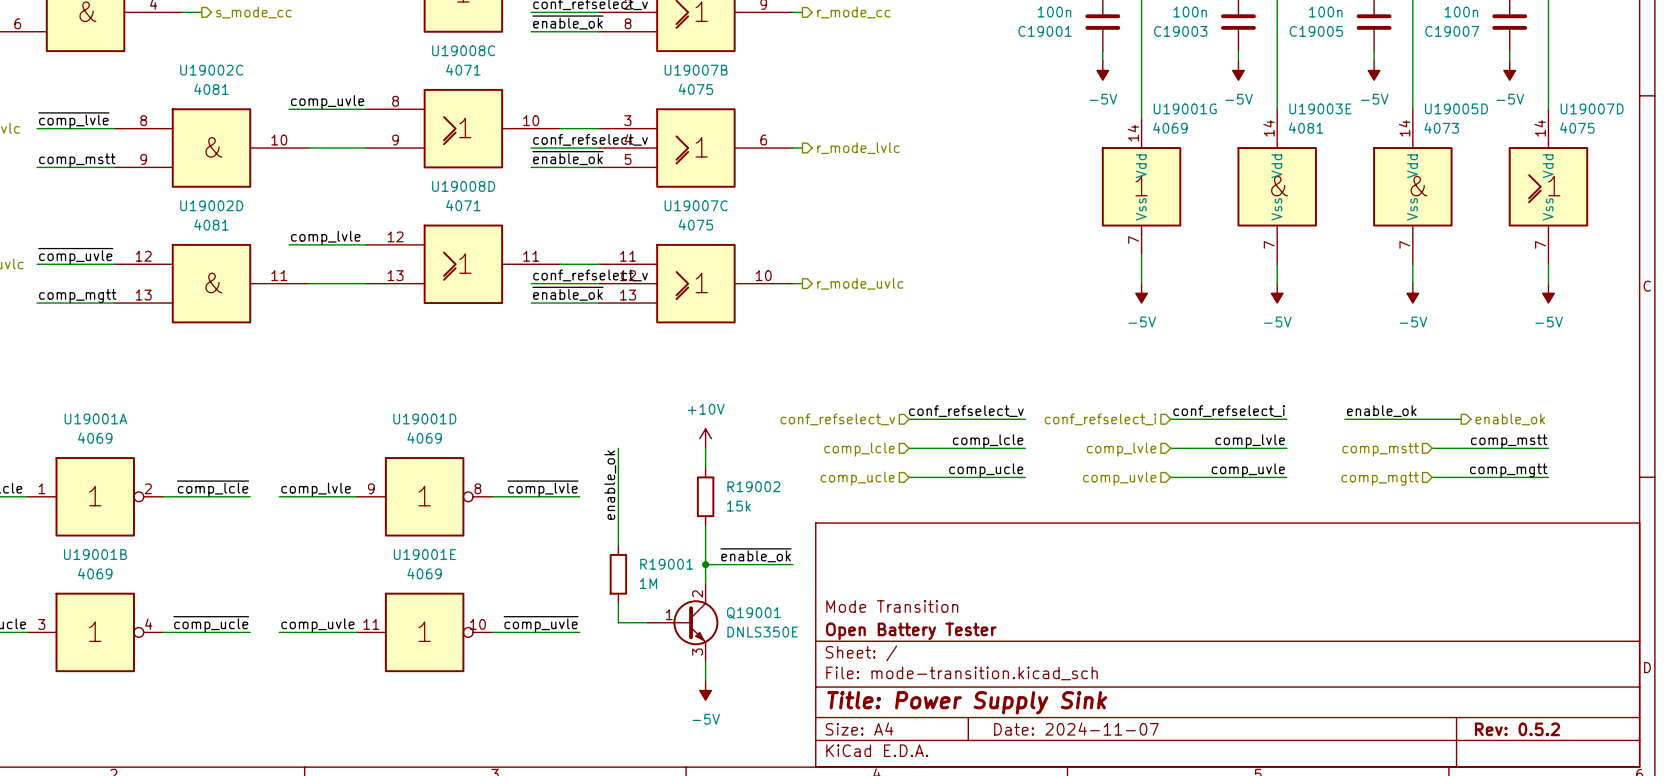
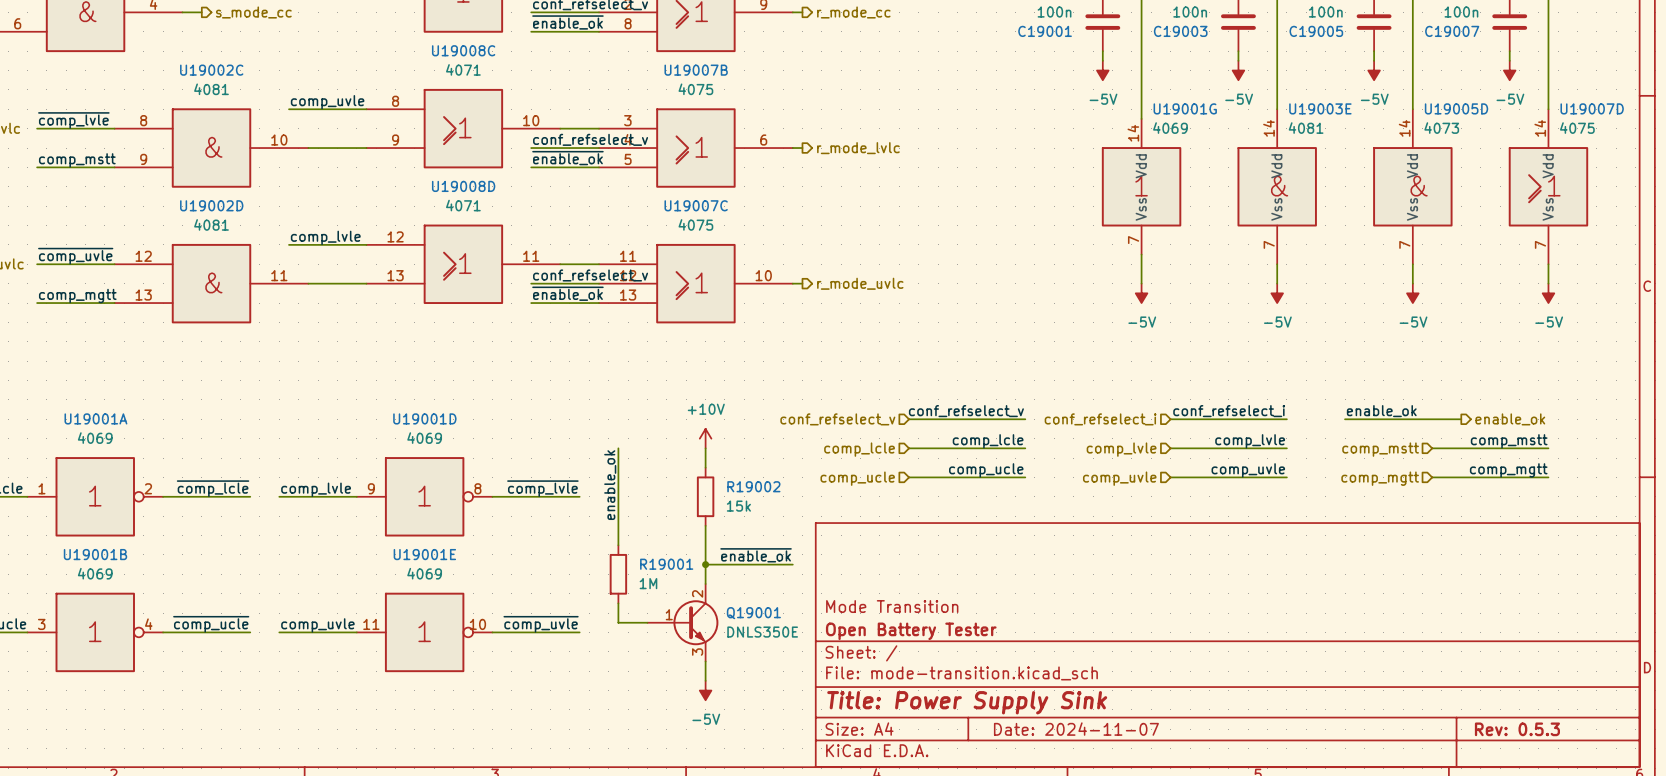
title block: Rev: 0.5.2 (1517, 729) -> Rev: 0.5.3 (1517, 729)

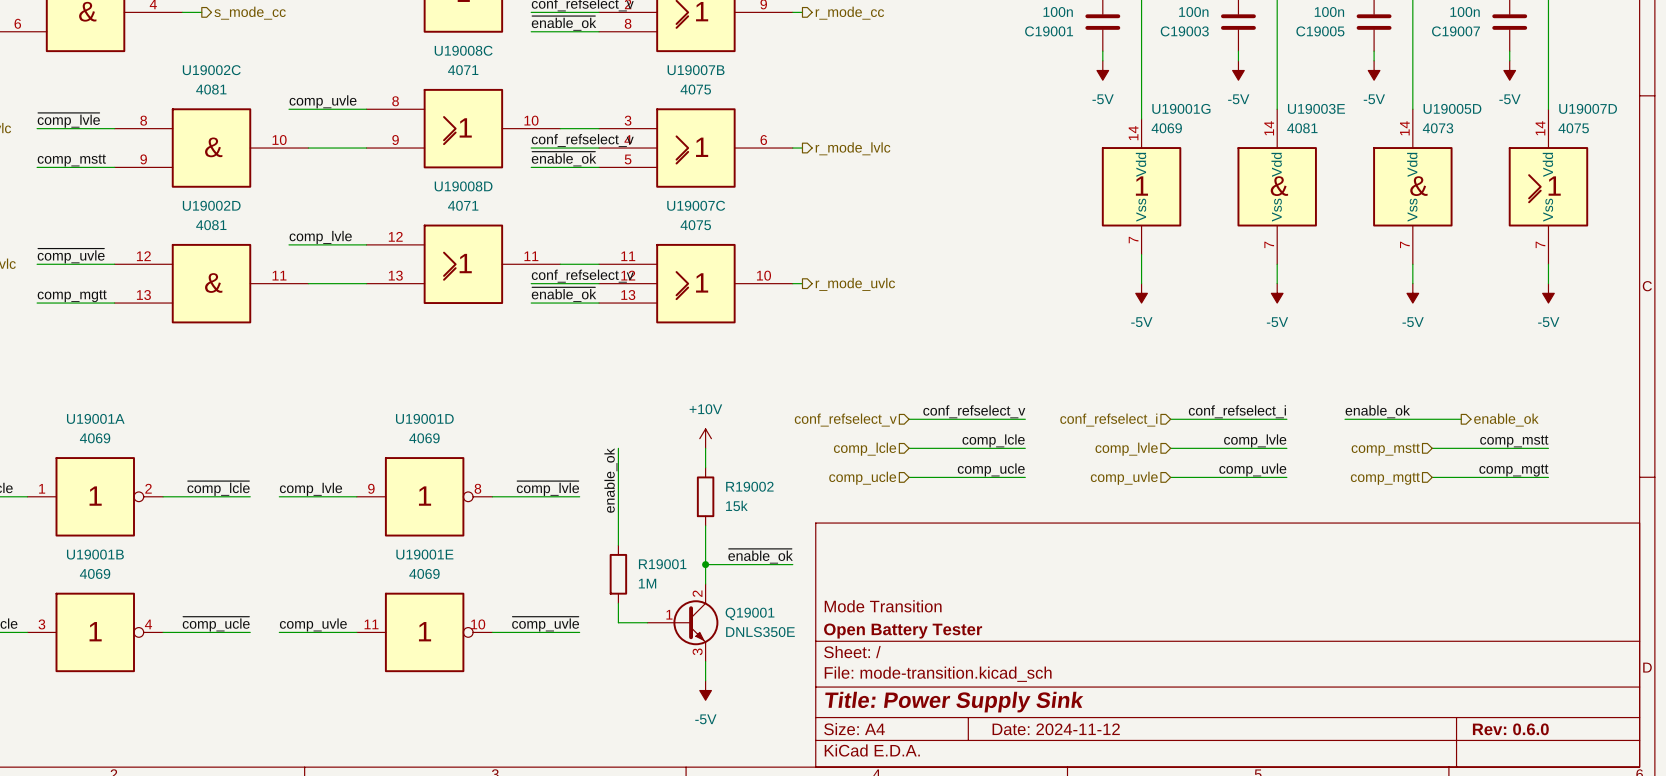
title block: Date: 2024-11-07 (1076, 729) -> Date: 2024-11-12 (1056, 729)
title block: Rev: 0.5.3 (1517, 729) -> Rev: 0.6.0 (1510, 729)

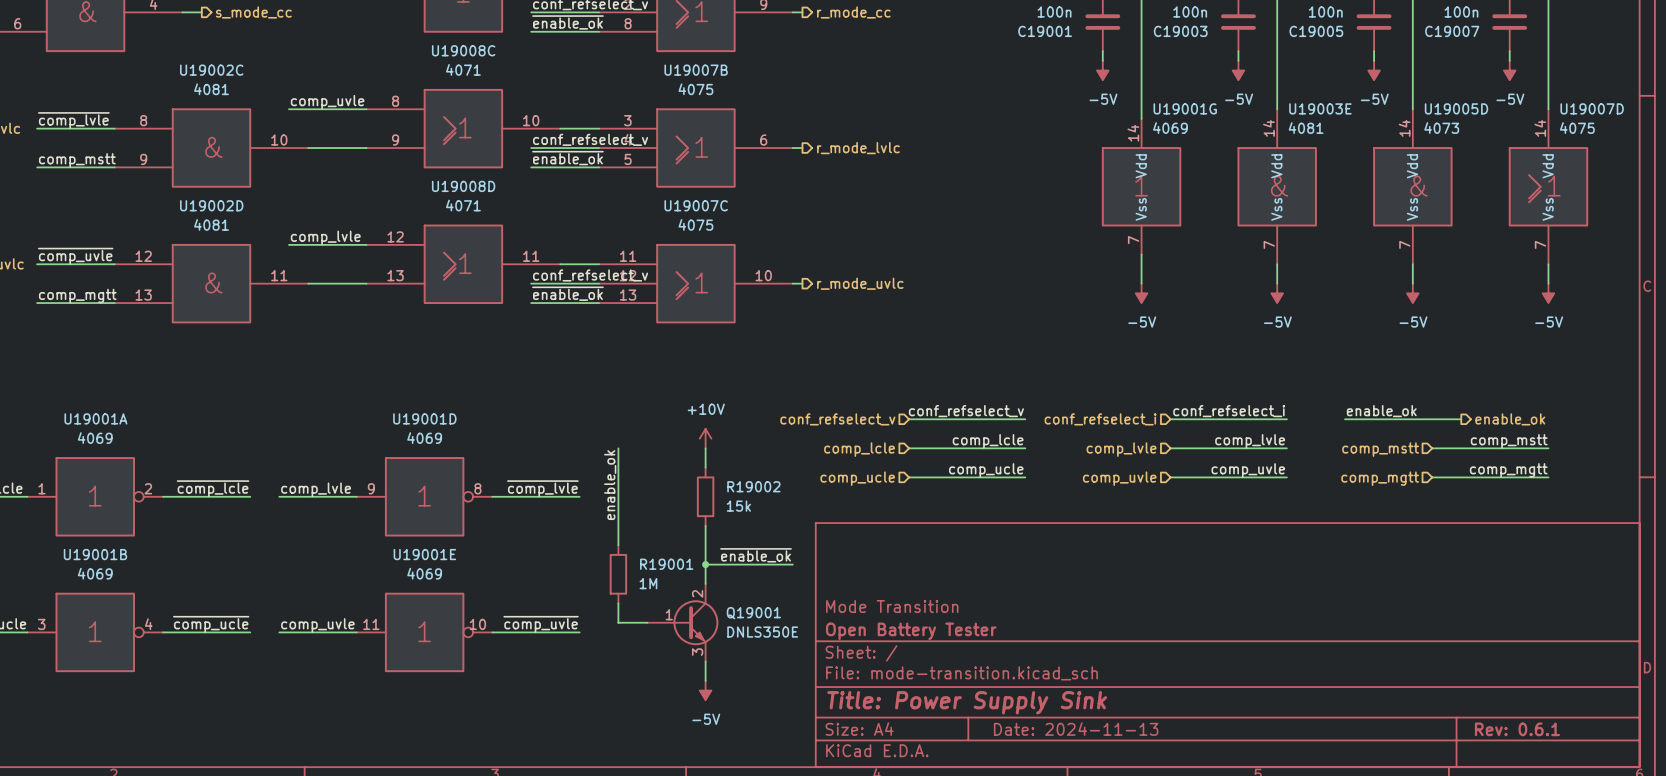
title block: Date: 2024-11-12 (1056, 729) -> Date: 2024-11-13 (1076, 729)
title block: Rev: 0.6.0 (1510, 729) -> Rev: 0.6.1 (1517, 729)

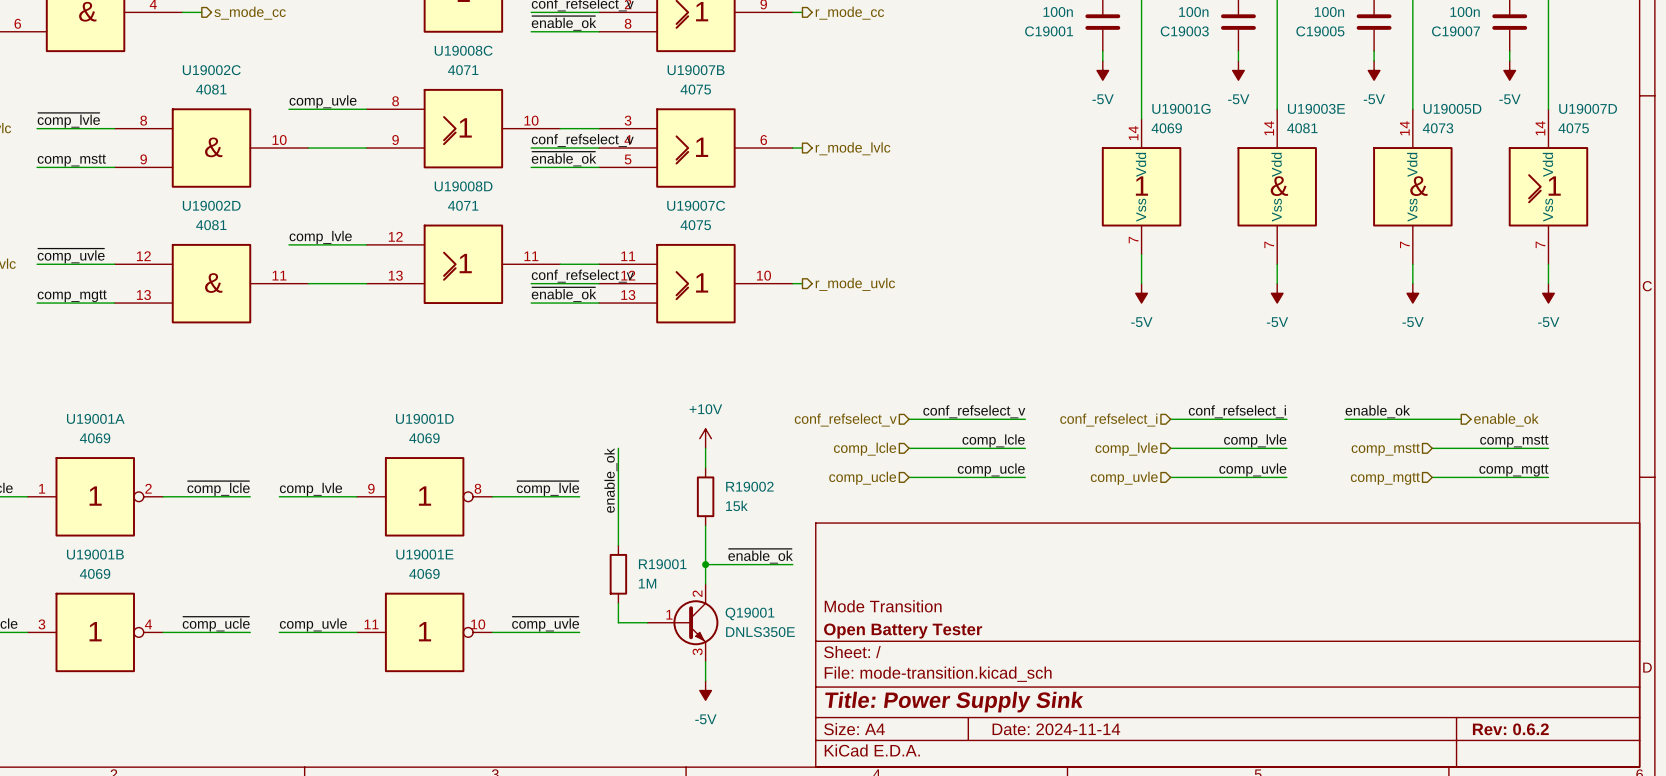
title block: Date: 2024-11-13 (1076, 729) -> Date: 2024-11-14 (1056, 729)
title block: Rev: 0.6.1 (1517, 729) -> Rev: 0.6.2 (1510, 729)

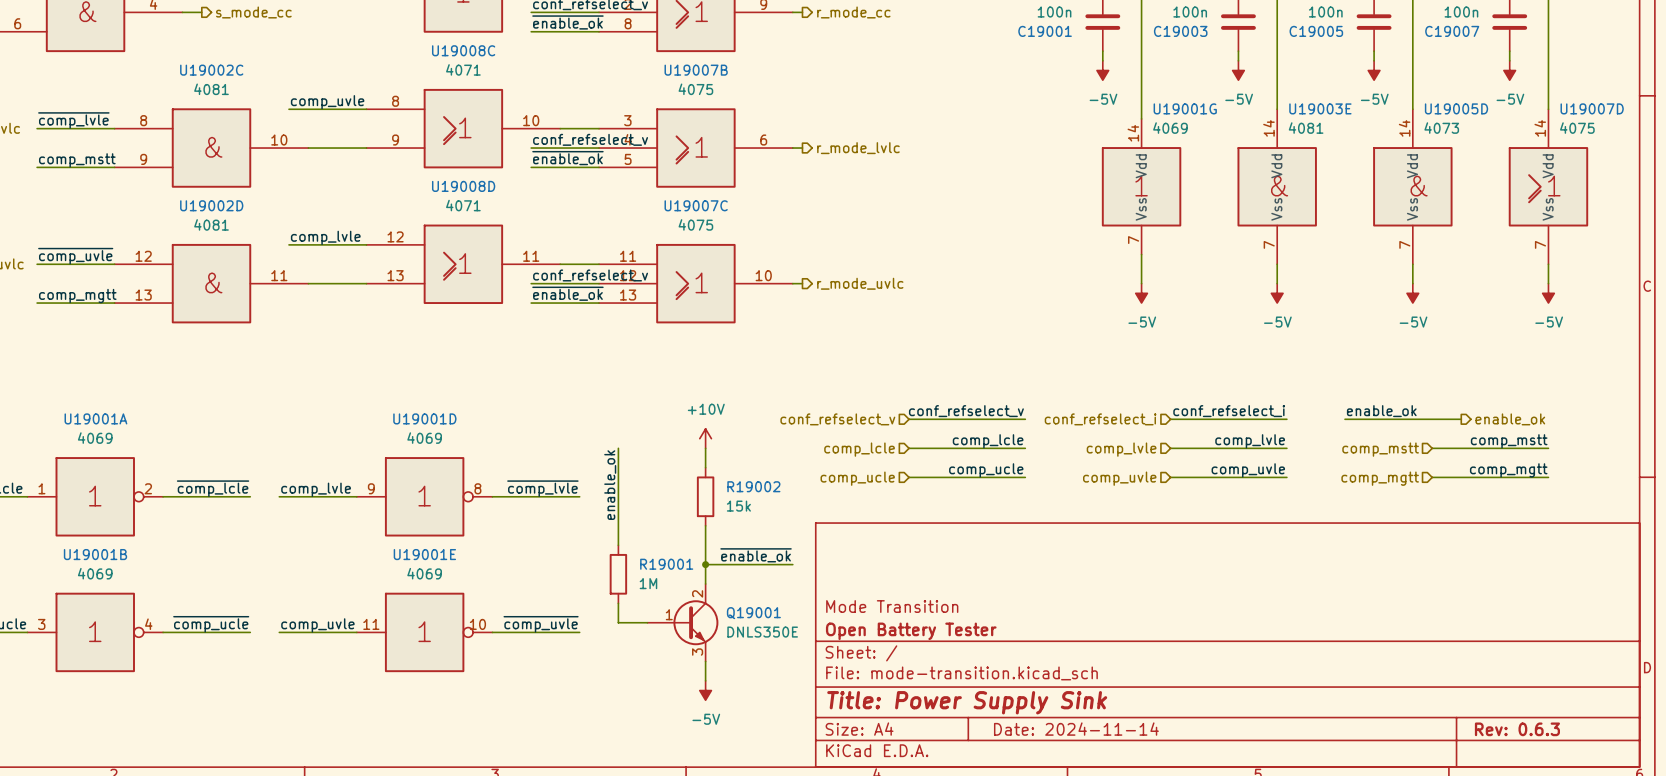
title block: Rev: 0.6.2 (1510, 729) -> Rev: 0.6.3 (1517, 729)

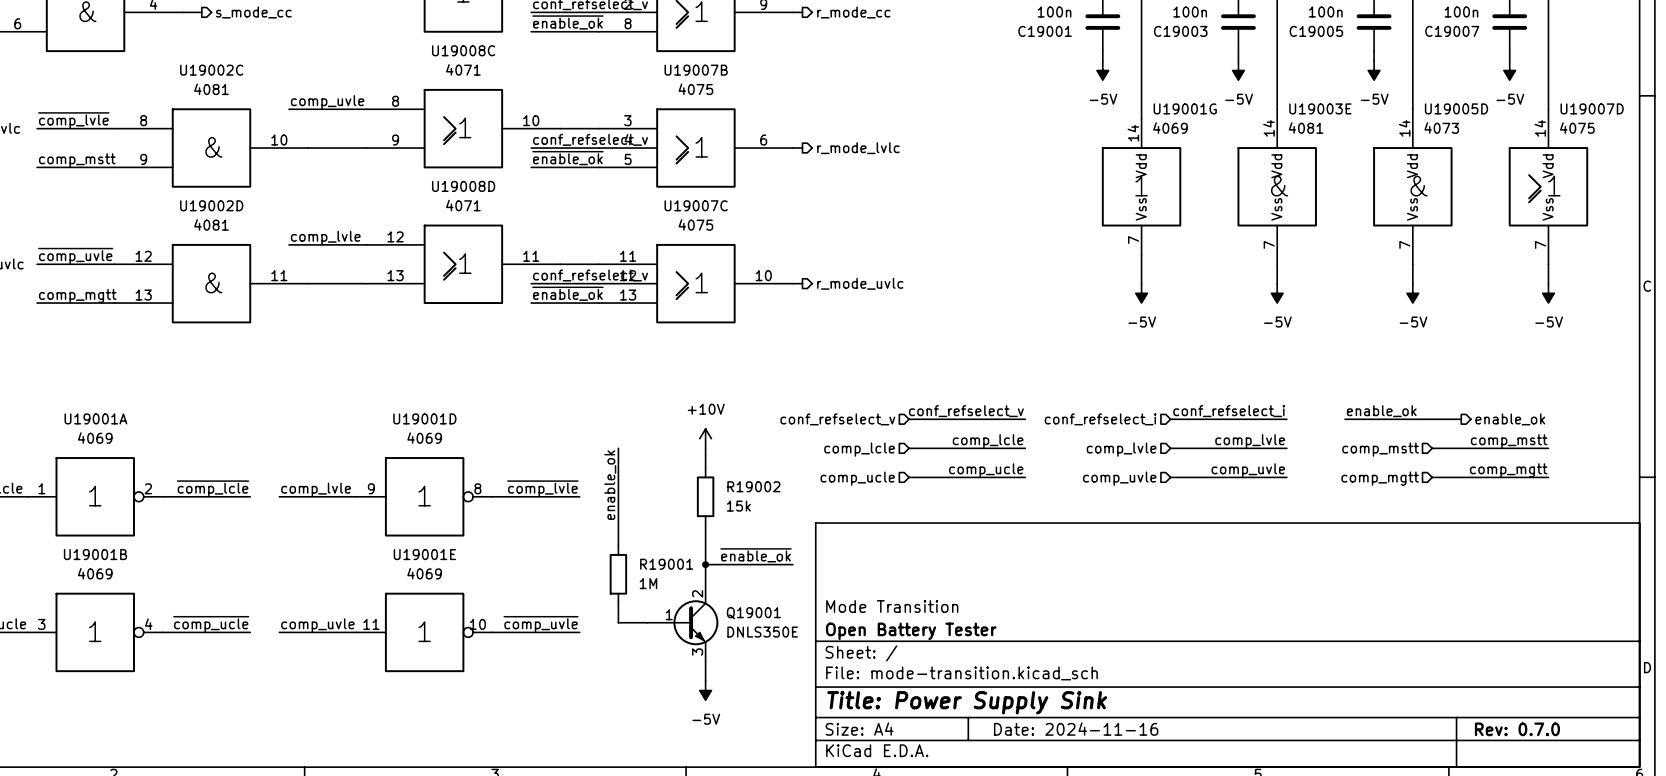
title block: Date: 2024-11-14 (1076, 729) -> Date: 2024-11-16 (1076, 729)
title block: Rev: 0.6.3 (1517, 729) -> Rev: 0.7.0 (1517, 729)

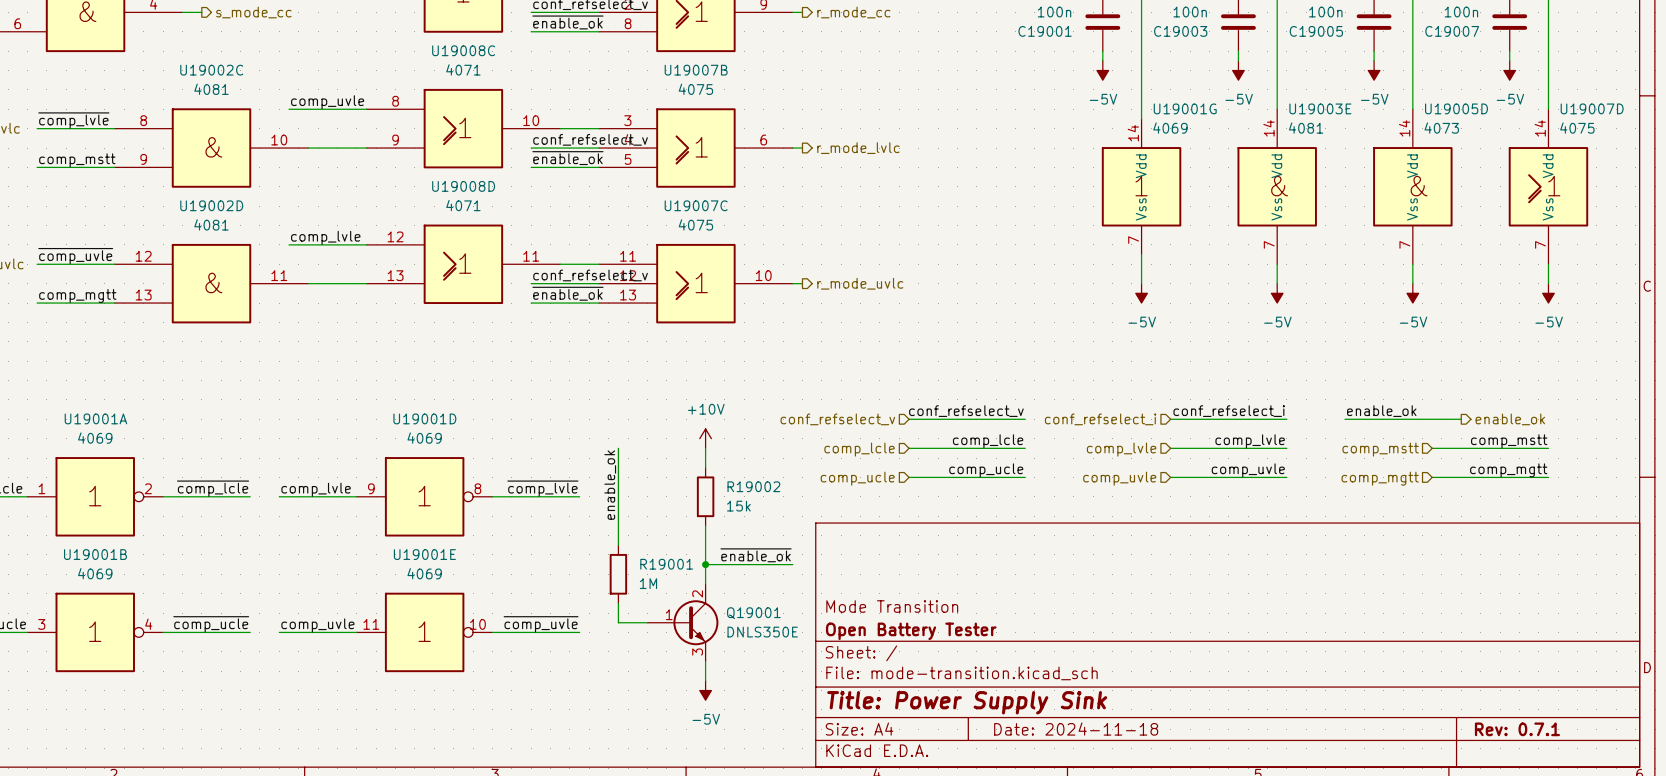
title block: Date: 2024-11-16 (1076, 729) -> Date: 2024-11-18 (1076, 729)
title block: Rev: 0.7.0 (1517, 729) -> Rev: 0.7.1 (1517, 729)

